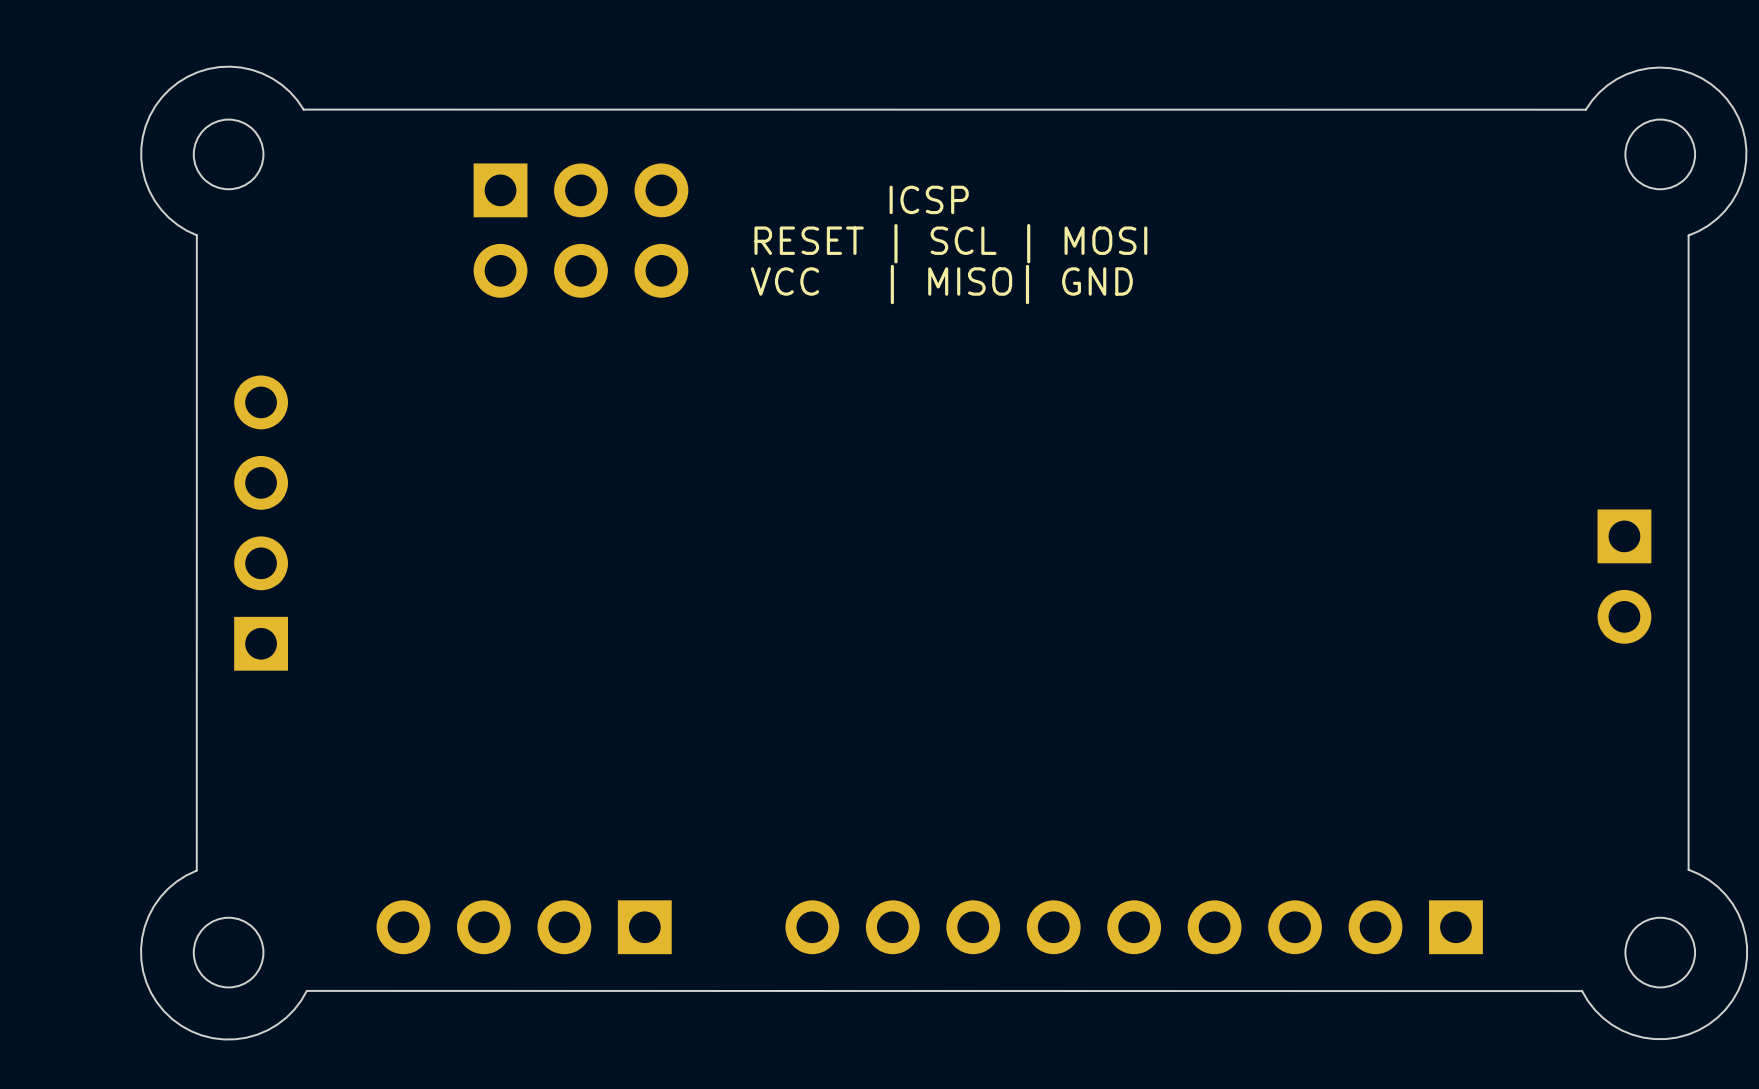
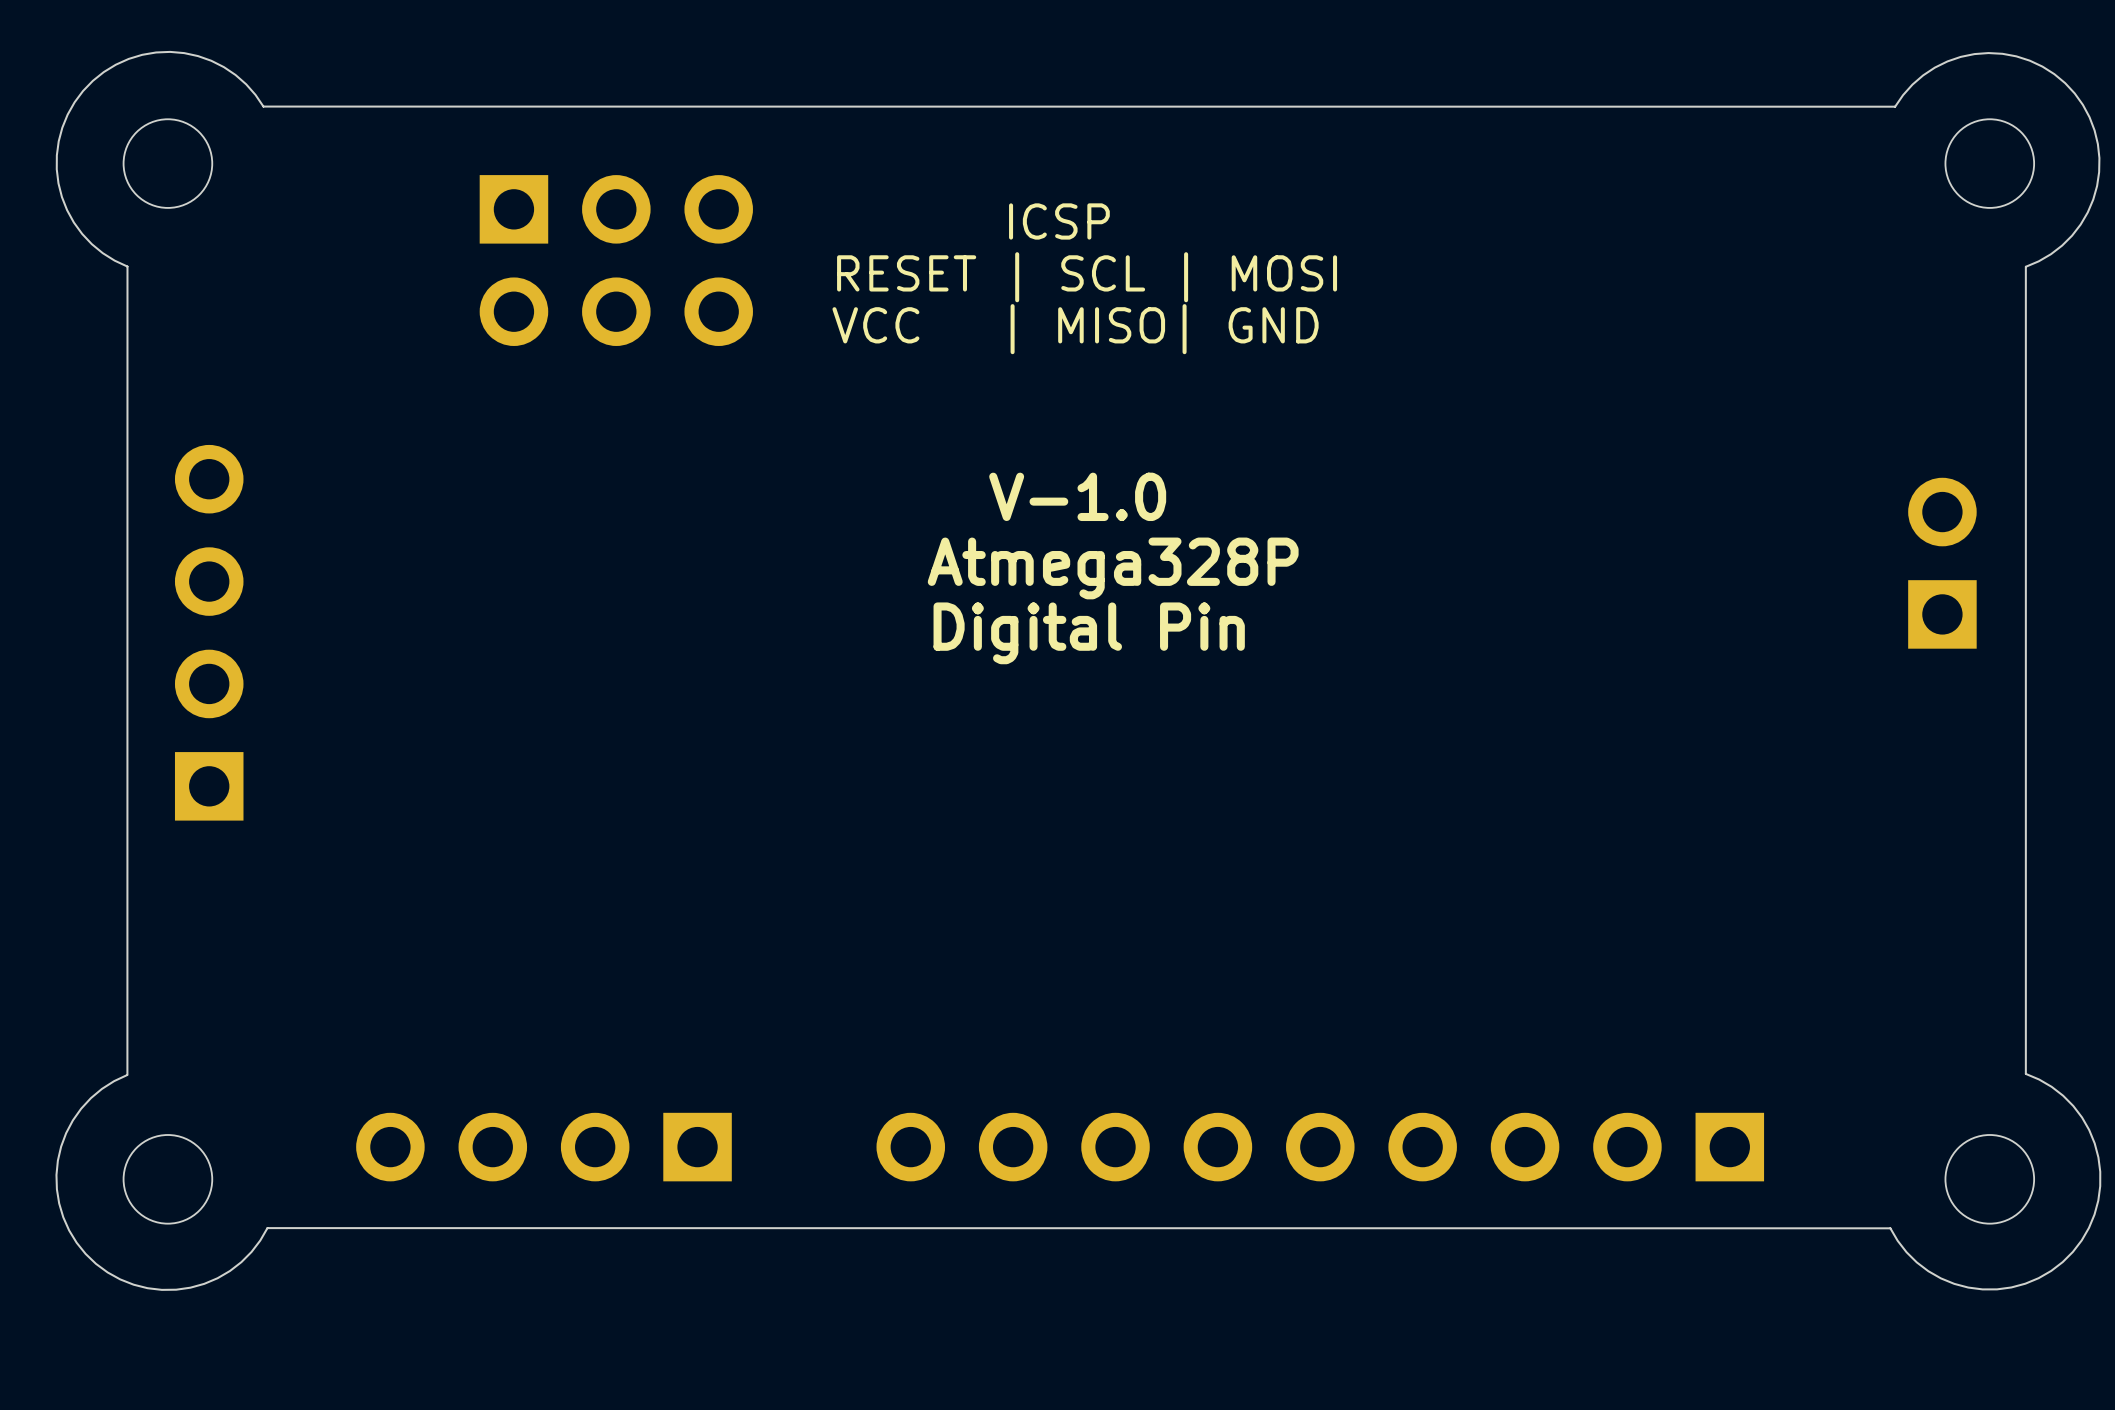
text: none -> V-1.0 (1077, 496)
text: none -> Atmega328P (1113, 568)
text: none -> Digital Pin (1089, 633)
part rotation: 0° (1624, 576) -> 180° (1942, 563)
part position: (1624, 576) -> (1942, 563)

